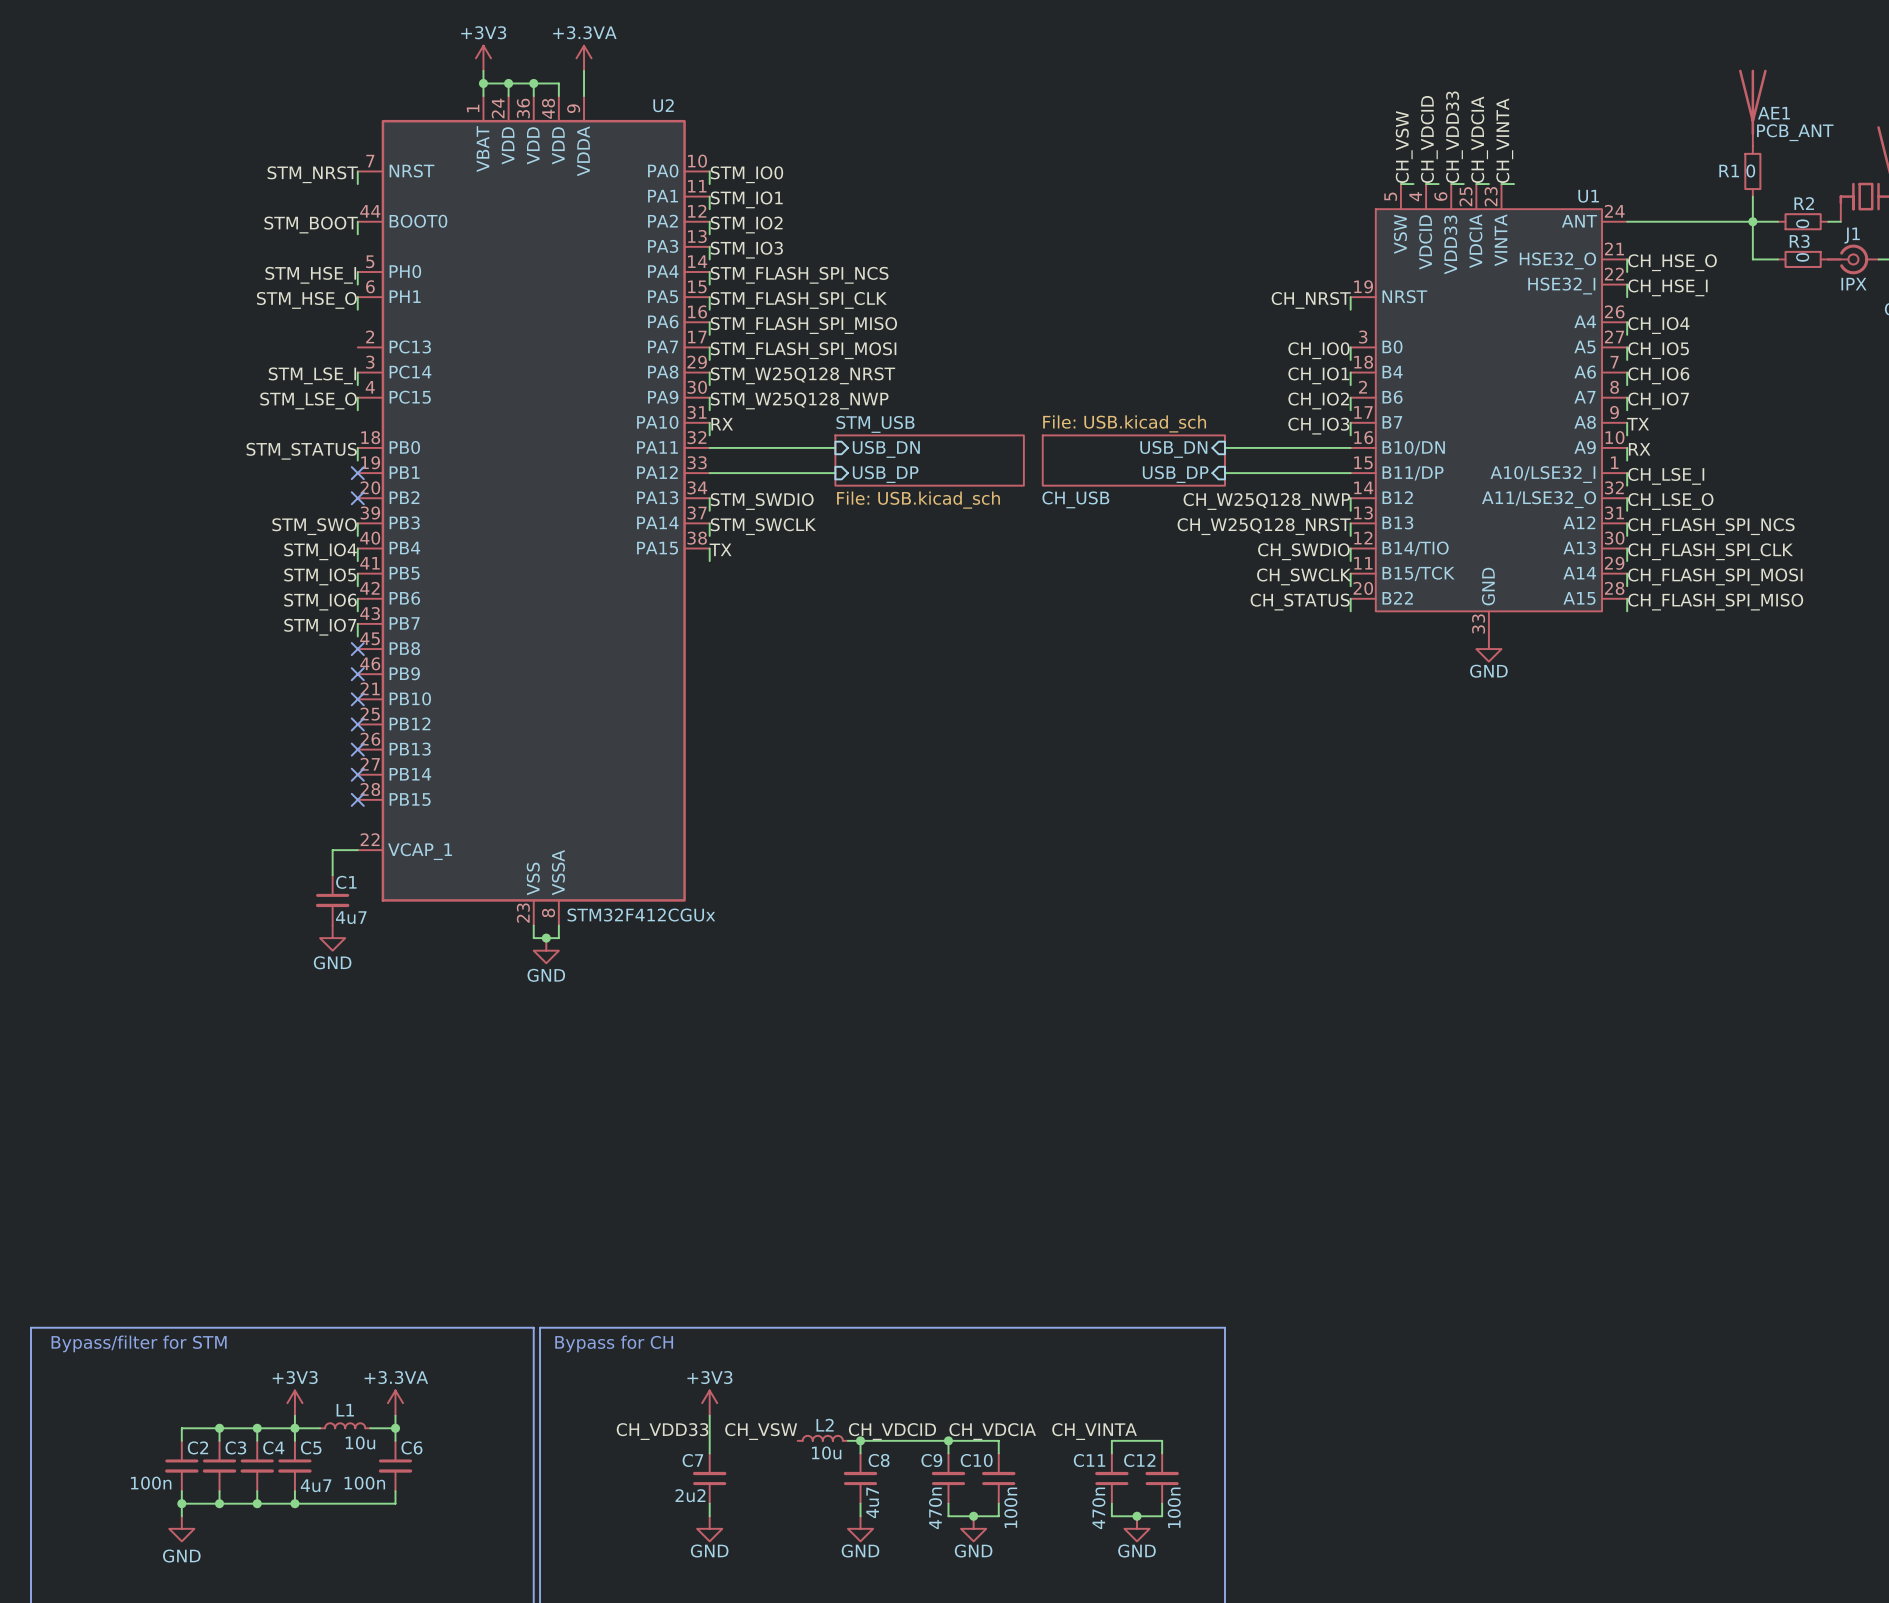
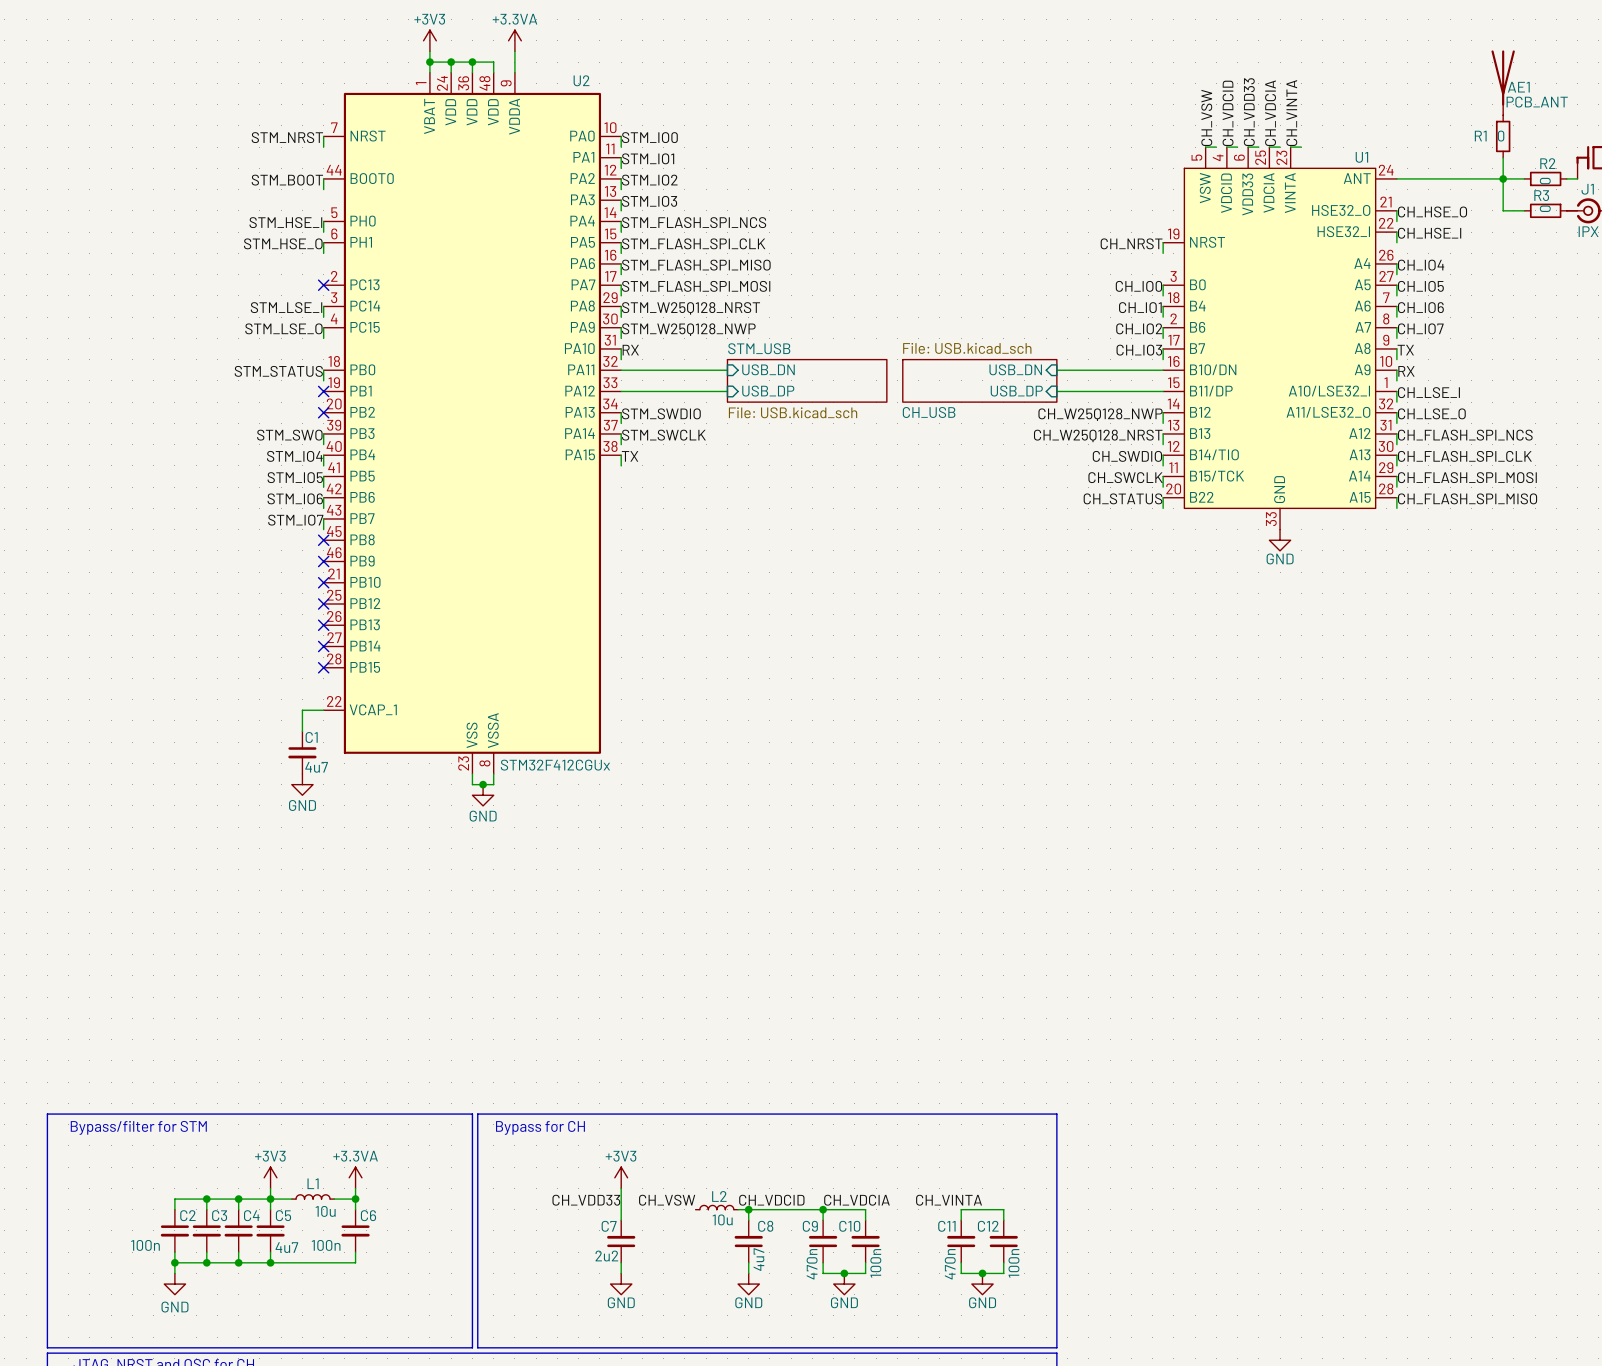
no-connect mark: none -> (323, 285)

